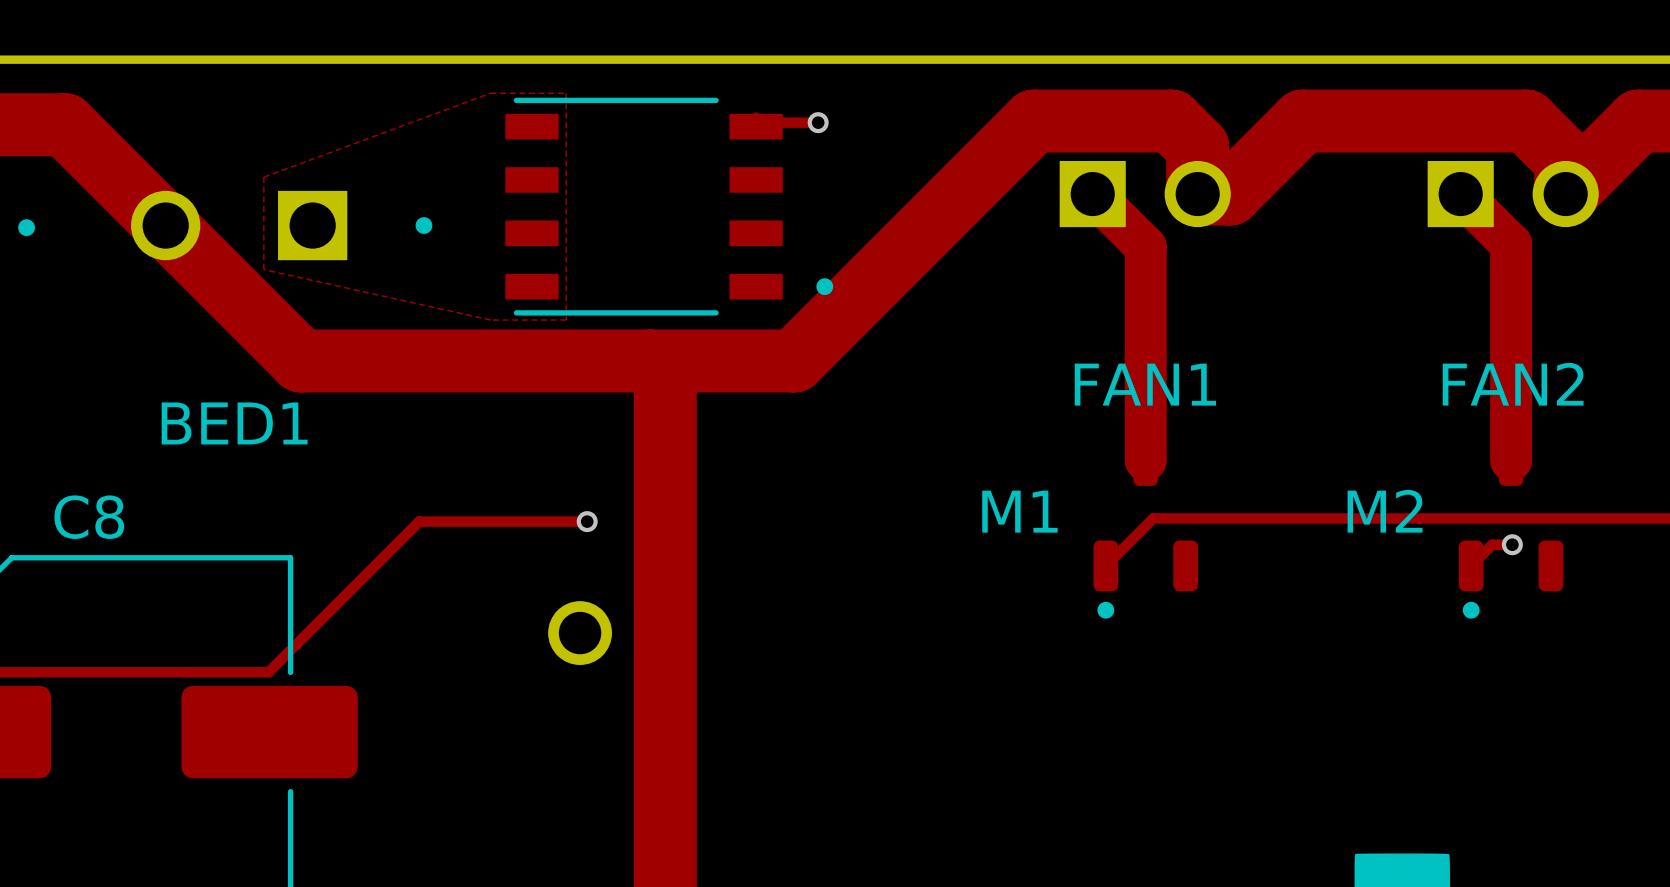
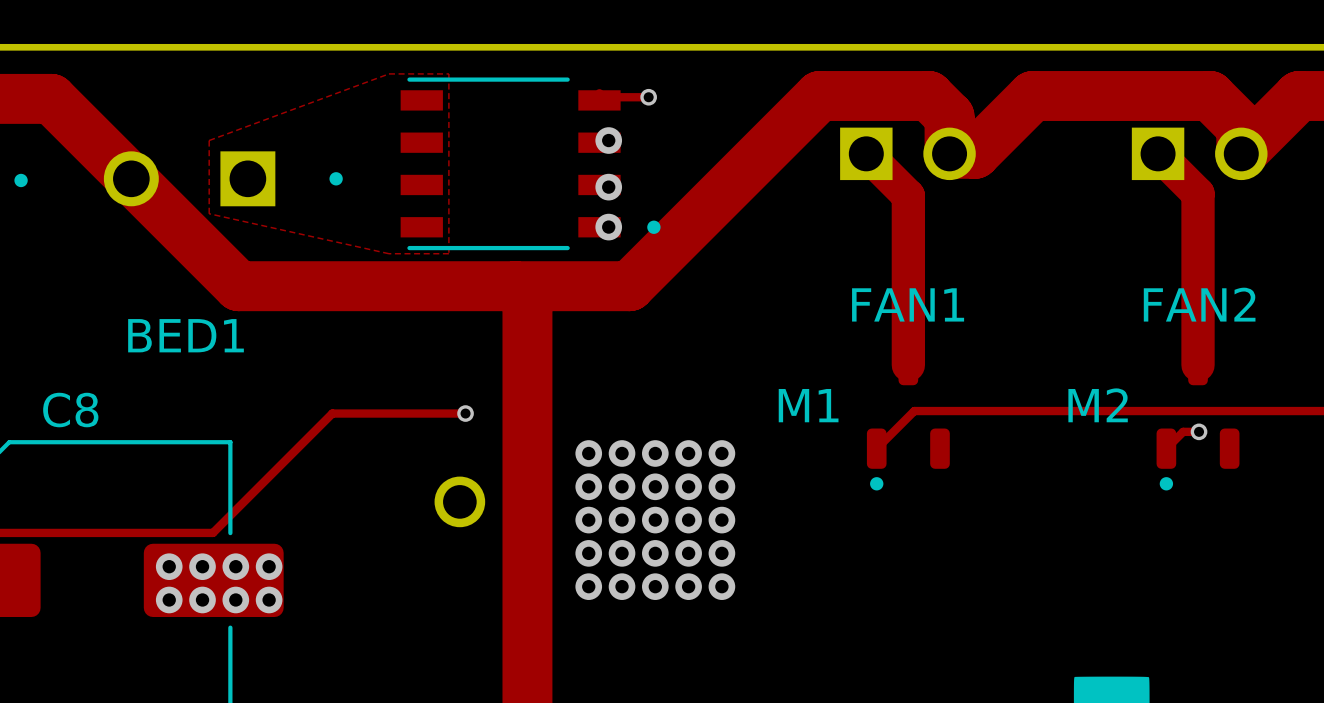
via: none -> (608, 140)
via: none -> (608, 187)
via: none -> (608, 227)
via: none -> (588, 453)
via: none -> (622, 453)
via: none -> (655, 453)
via: none -> (688, 453)
via: none -> (721, 453)
via: none -> (588, 486)
via: none -> (622, 486)
via: none -> (655, 486)
via: none -> (688, 486)
via: none -> (721, 486)
via: none -> (588, 520)
via: none -> (622, 520)
via: none -> (655, 520)
via: none -> (688, 520)
via: none -> (721, 520)
via: none -> (588, 553)
via: none -> (622, 553)
via: none -> (655, 553)
via: none -> (688, 553)
via: none -> (721, 553)
via: none -> (169, 566)
via: none -> (202, 566)
via: none -> (235, 566)
via: none -> (269, 566)
via: none -> (588, 586)
via: none -> (622, 586)
via: none -> (655, 586)
via: none -> (688, 586)
via: none -> (721, 586)
via: none -> (169, 599)
via: none -> (202, 599)
via: none -> (235, 599)
via: none -> (269, 599)

